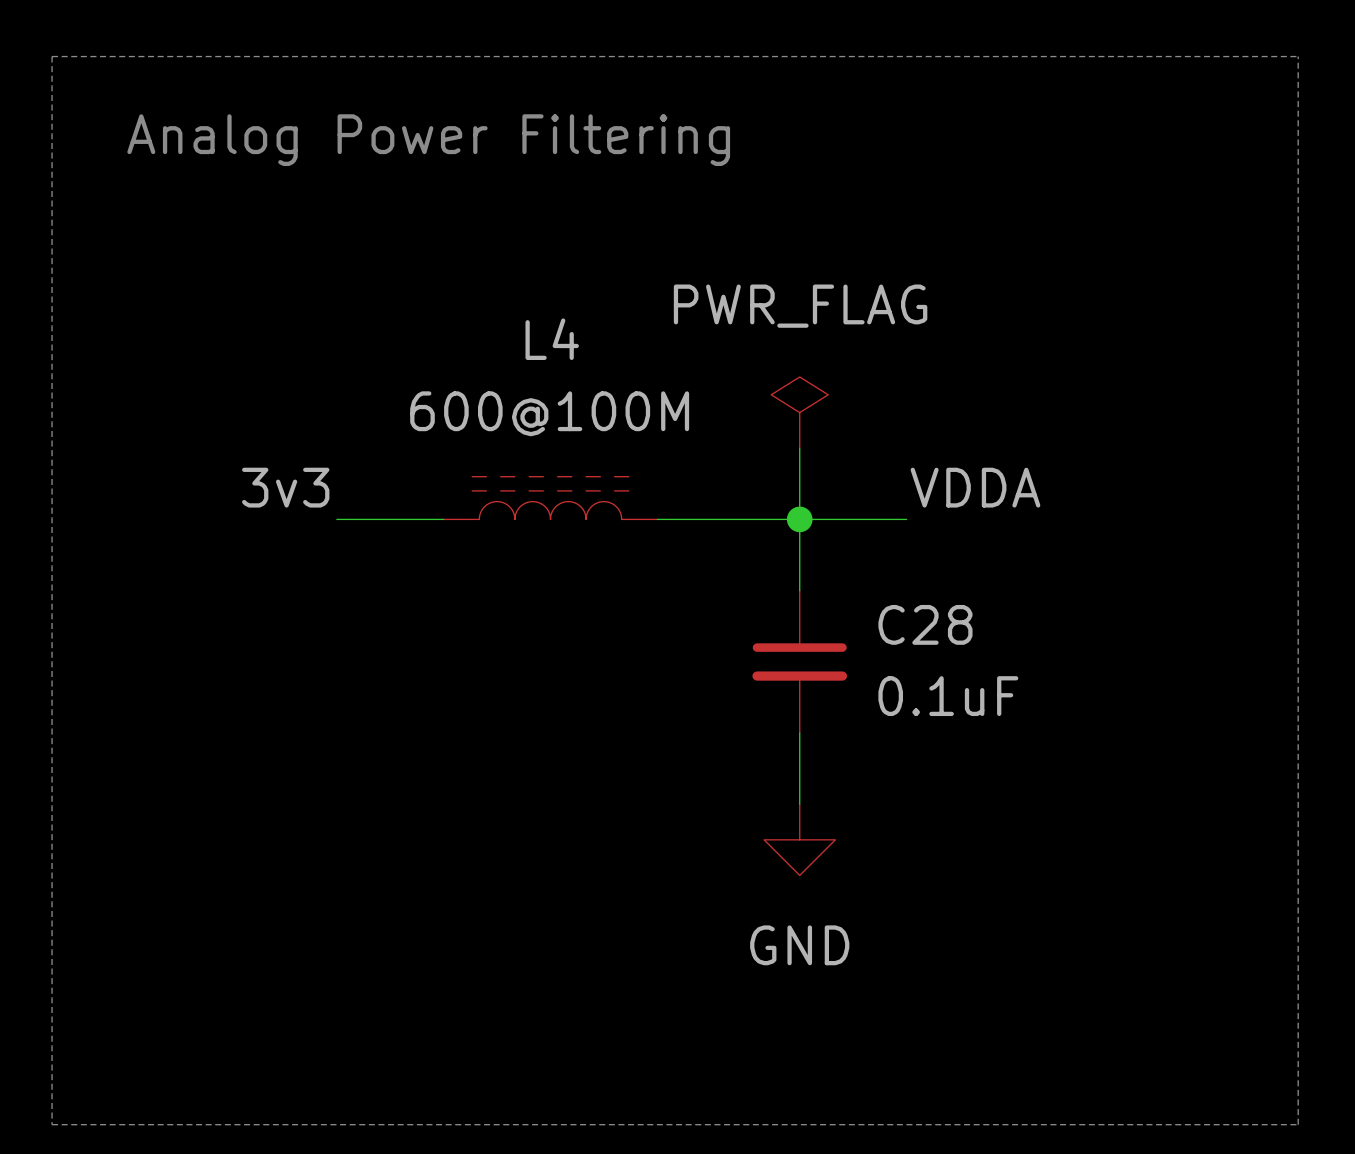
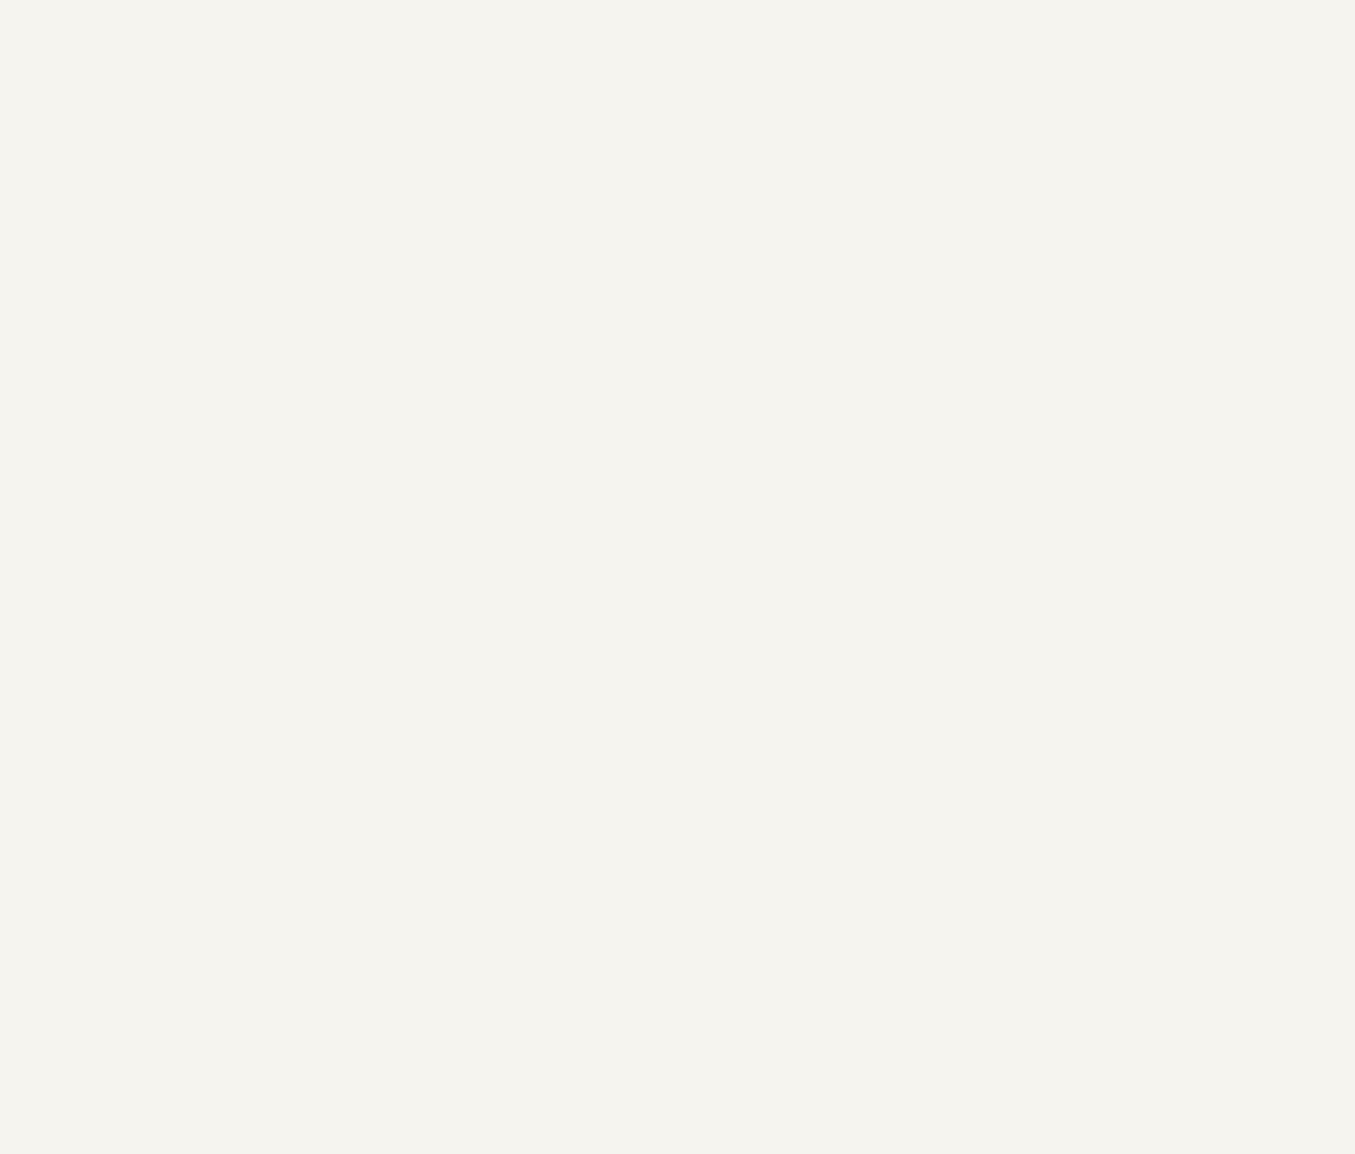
line: (52, 56) (1298, 56) (1298, 1124) (52, 1124) (52, 56) -> none
text: Analog Power Filtering (428, 140) -> none
power symbol: PWR_FLAG (799, 412) -> none
wire: (799, 448) (799, 590) -> none
label: 3v3 (285, 487) -> none
label: VDDA (975, 487) -> none
L4: 600@100M (550, 498) -> none
wire: (336, 519) (443, 519) -> none
wire: (657, 519) (906, 519) -> none
junction: (799, 519) -> none
C28: 0.1uF (799, 661) -> none
wire: (799, 733) (799, 804) -> none
power symbol: GND (799, 839) -> none

